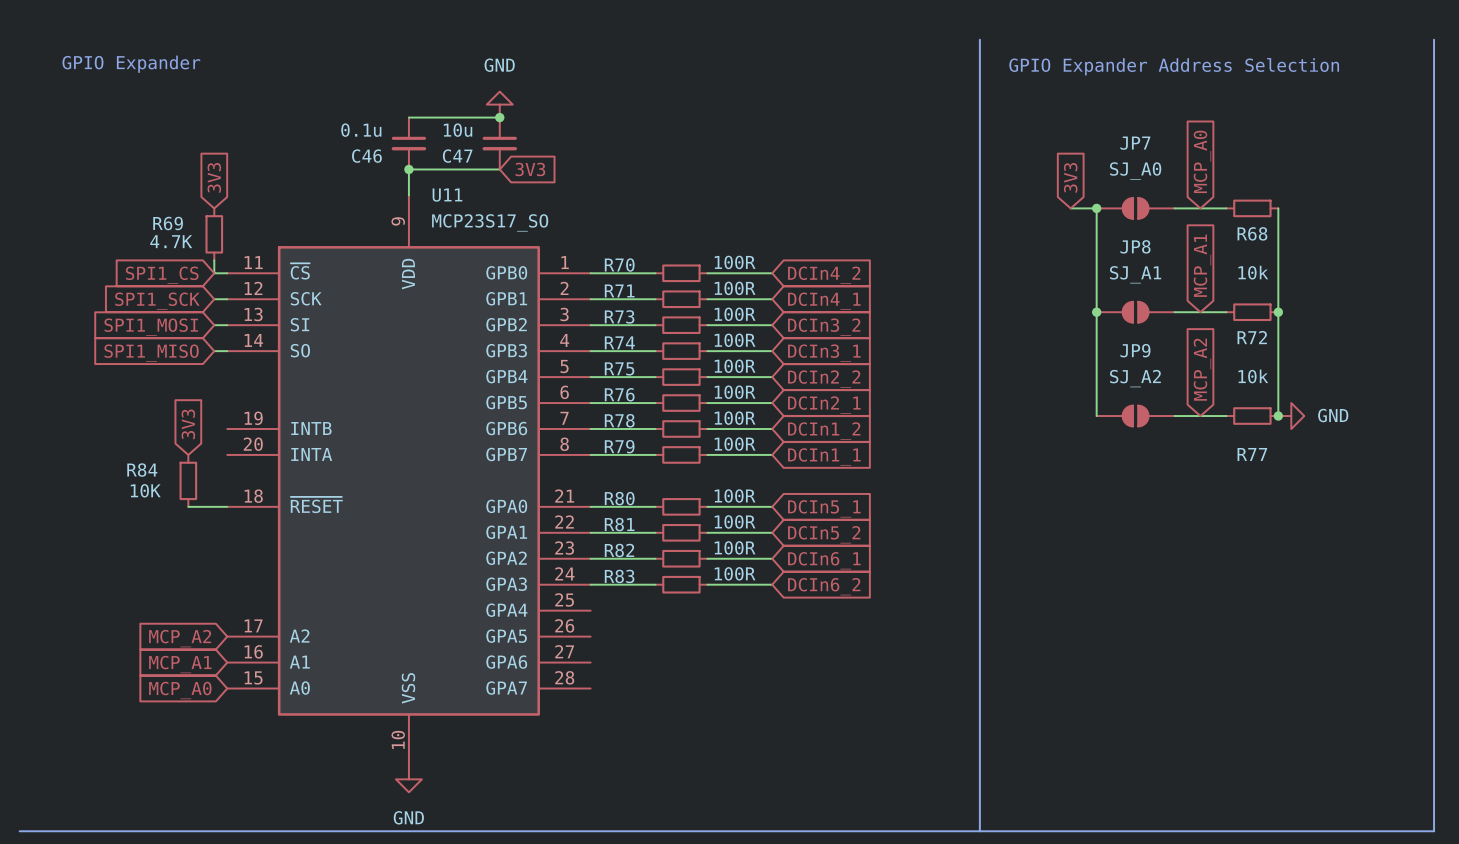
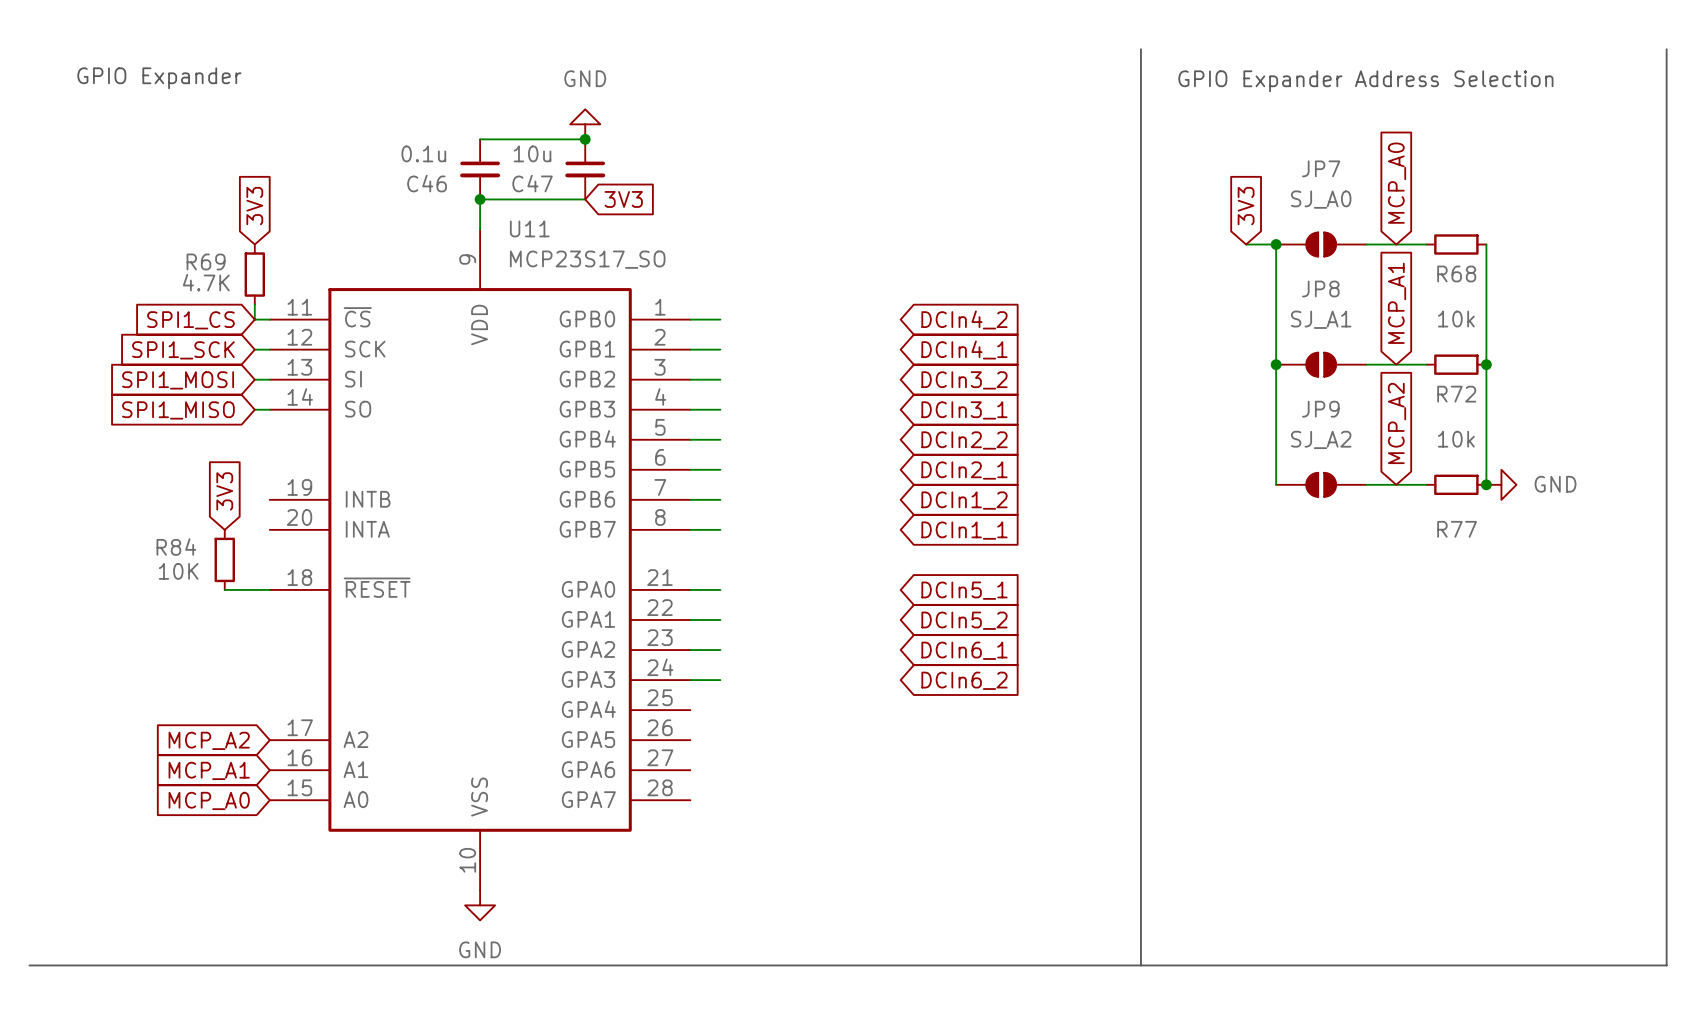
wire: (616, 273) (655, 273) -> none
R70: 100R (681, 273) -> none
wire: (707, 273) (772, 273) -> none
wire: (616, 299) (655, 299) -> none
R71: 100R (681, 299) -> none
wire: (707, 299) (772, 299) -> none
wire: (616, 325) (655, 325) -> none
R73: 100R (681, 325) -> none
wire: (707, 325) (772, 325) -> none
wire: (616, 351) (655, 351) -> none
R74: 100R (681, 351) -> none
wire: (707, 351) (772, 351) -> none
wire: (616, 377) (655, 377) -> none
R75: 100R (681, 377) -> none
wire: (707, 377) (772, 377) -> none
wire: (616, 403) (655, 403) -> none
R76: 100R (681, 403) -> none
wire: (707, 403) (772, 403) -> none
wire: (616, 429) (655, 429) -> none
R78: 100R (681, 429) -> none
wire: (707, 429) (772, 429) -> none
wire: (616, 454) (655, 454) -> none
R79: 100R (681, 454) -> none
wire: (707, 454) (772, 454) -> none
wire: (616, 506) (655, 506) -> none
R80: 100R (681, 506) -> none
wire: (707, 506) (772, 506) -> none
wire: (616, 532) (655, 532) -> none
R81: 100R (681, 532) -> none
wire: (707, 532) (772, 532) -> none
wire: (616, 558) (655, 558) -> none
R82: 100R (681, 558) -> none
wire: (707, 558) (772, 558) -> none
wire: (616, 584) (655, 584) -> none
R83: 100R (681, 584) -> none
wire: (707, 584) (772, 584) -> none

